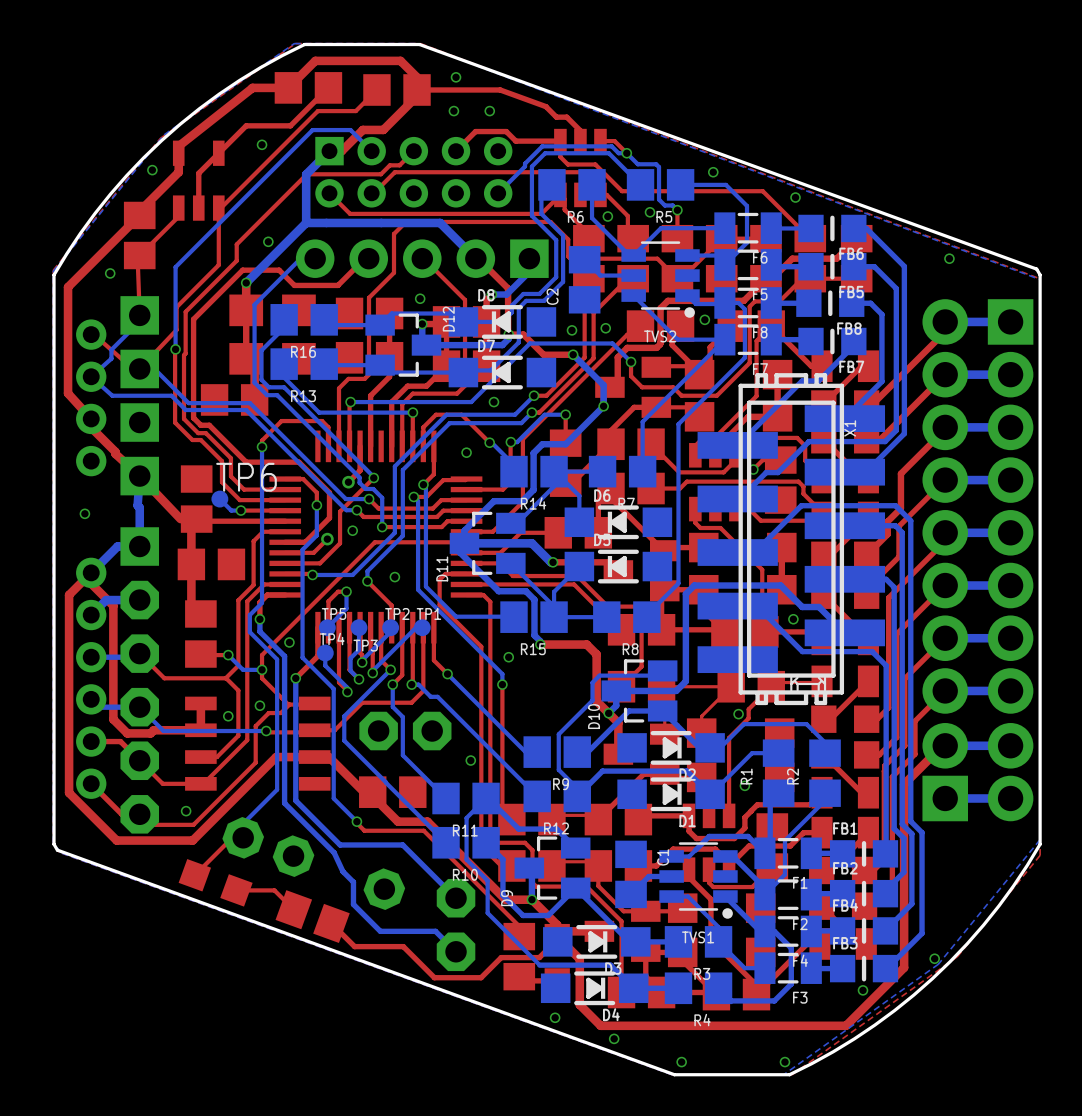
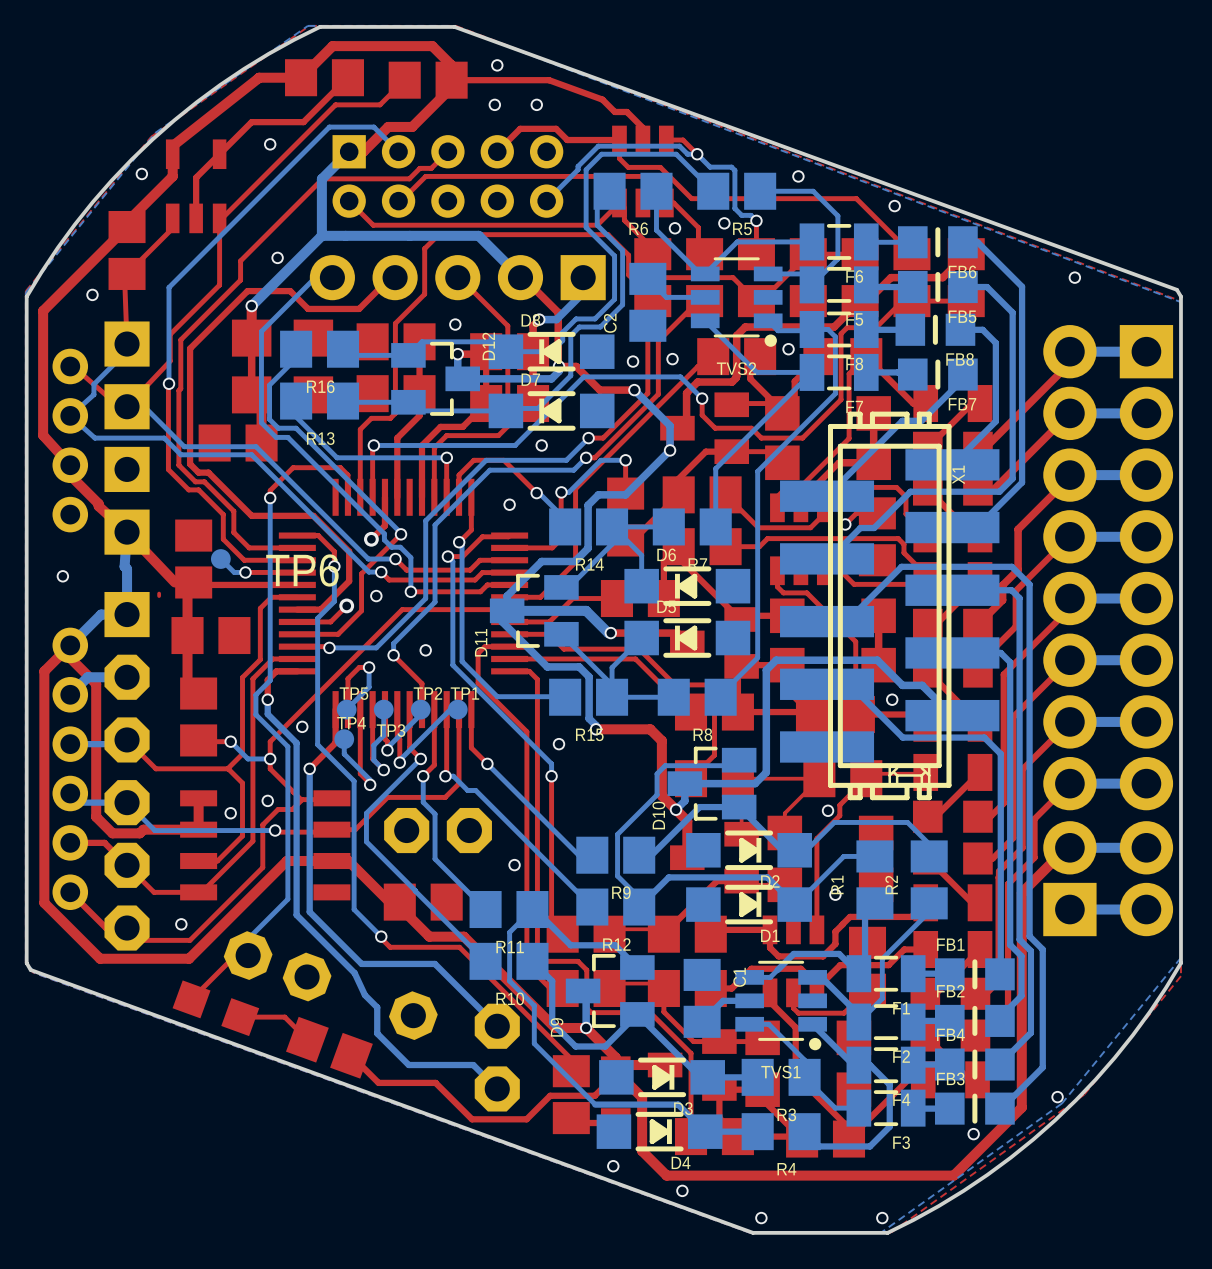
TP6 name position: TP6 (246, 477) -> TP6 (302, 570)
top track: none -> (159, 593) (159, 596)

